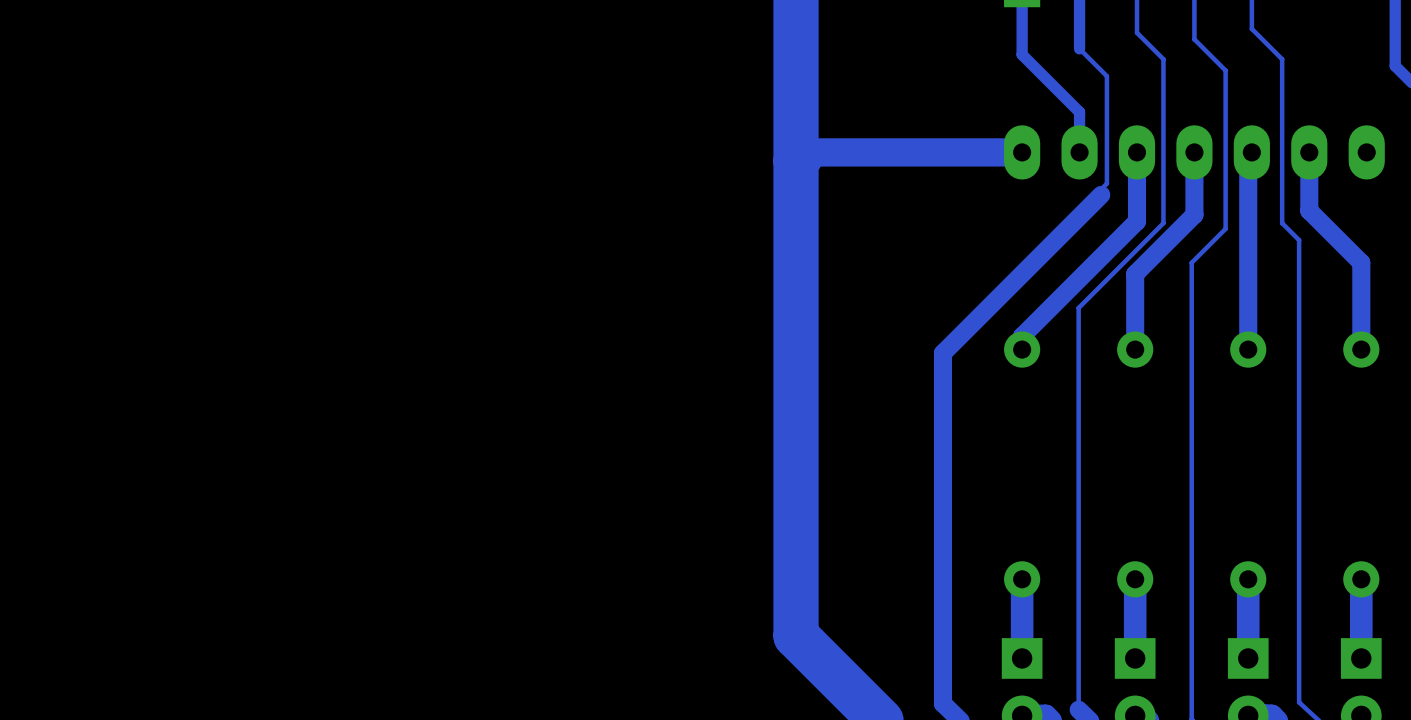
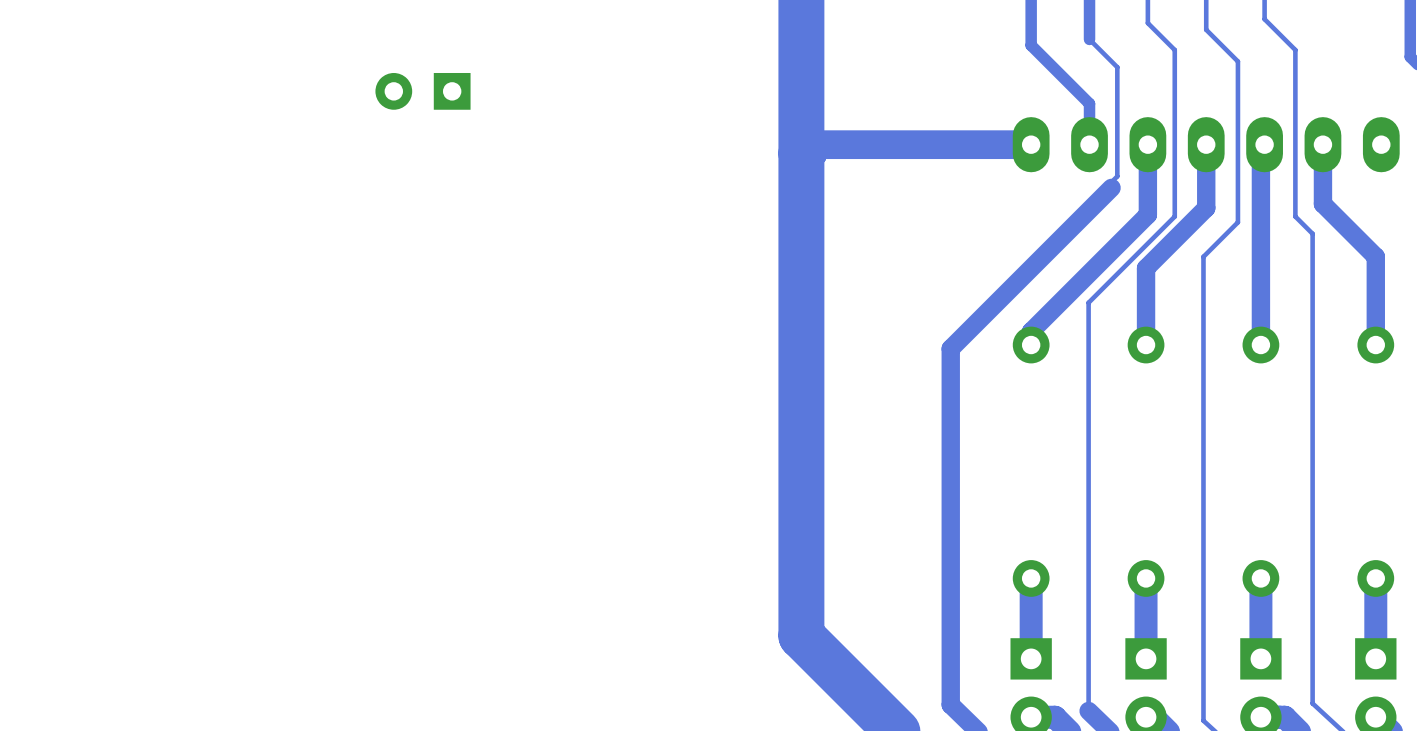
part: none -> (422, 91)

